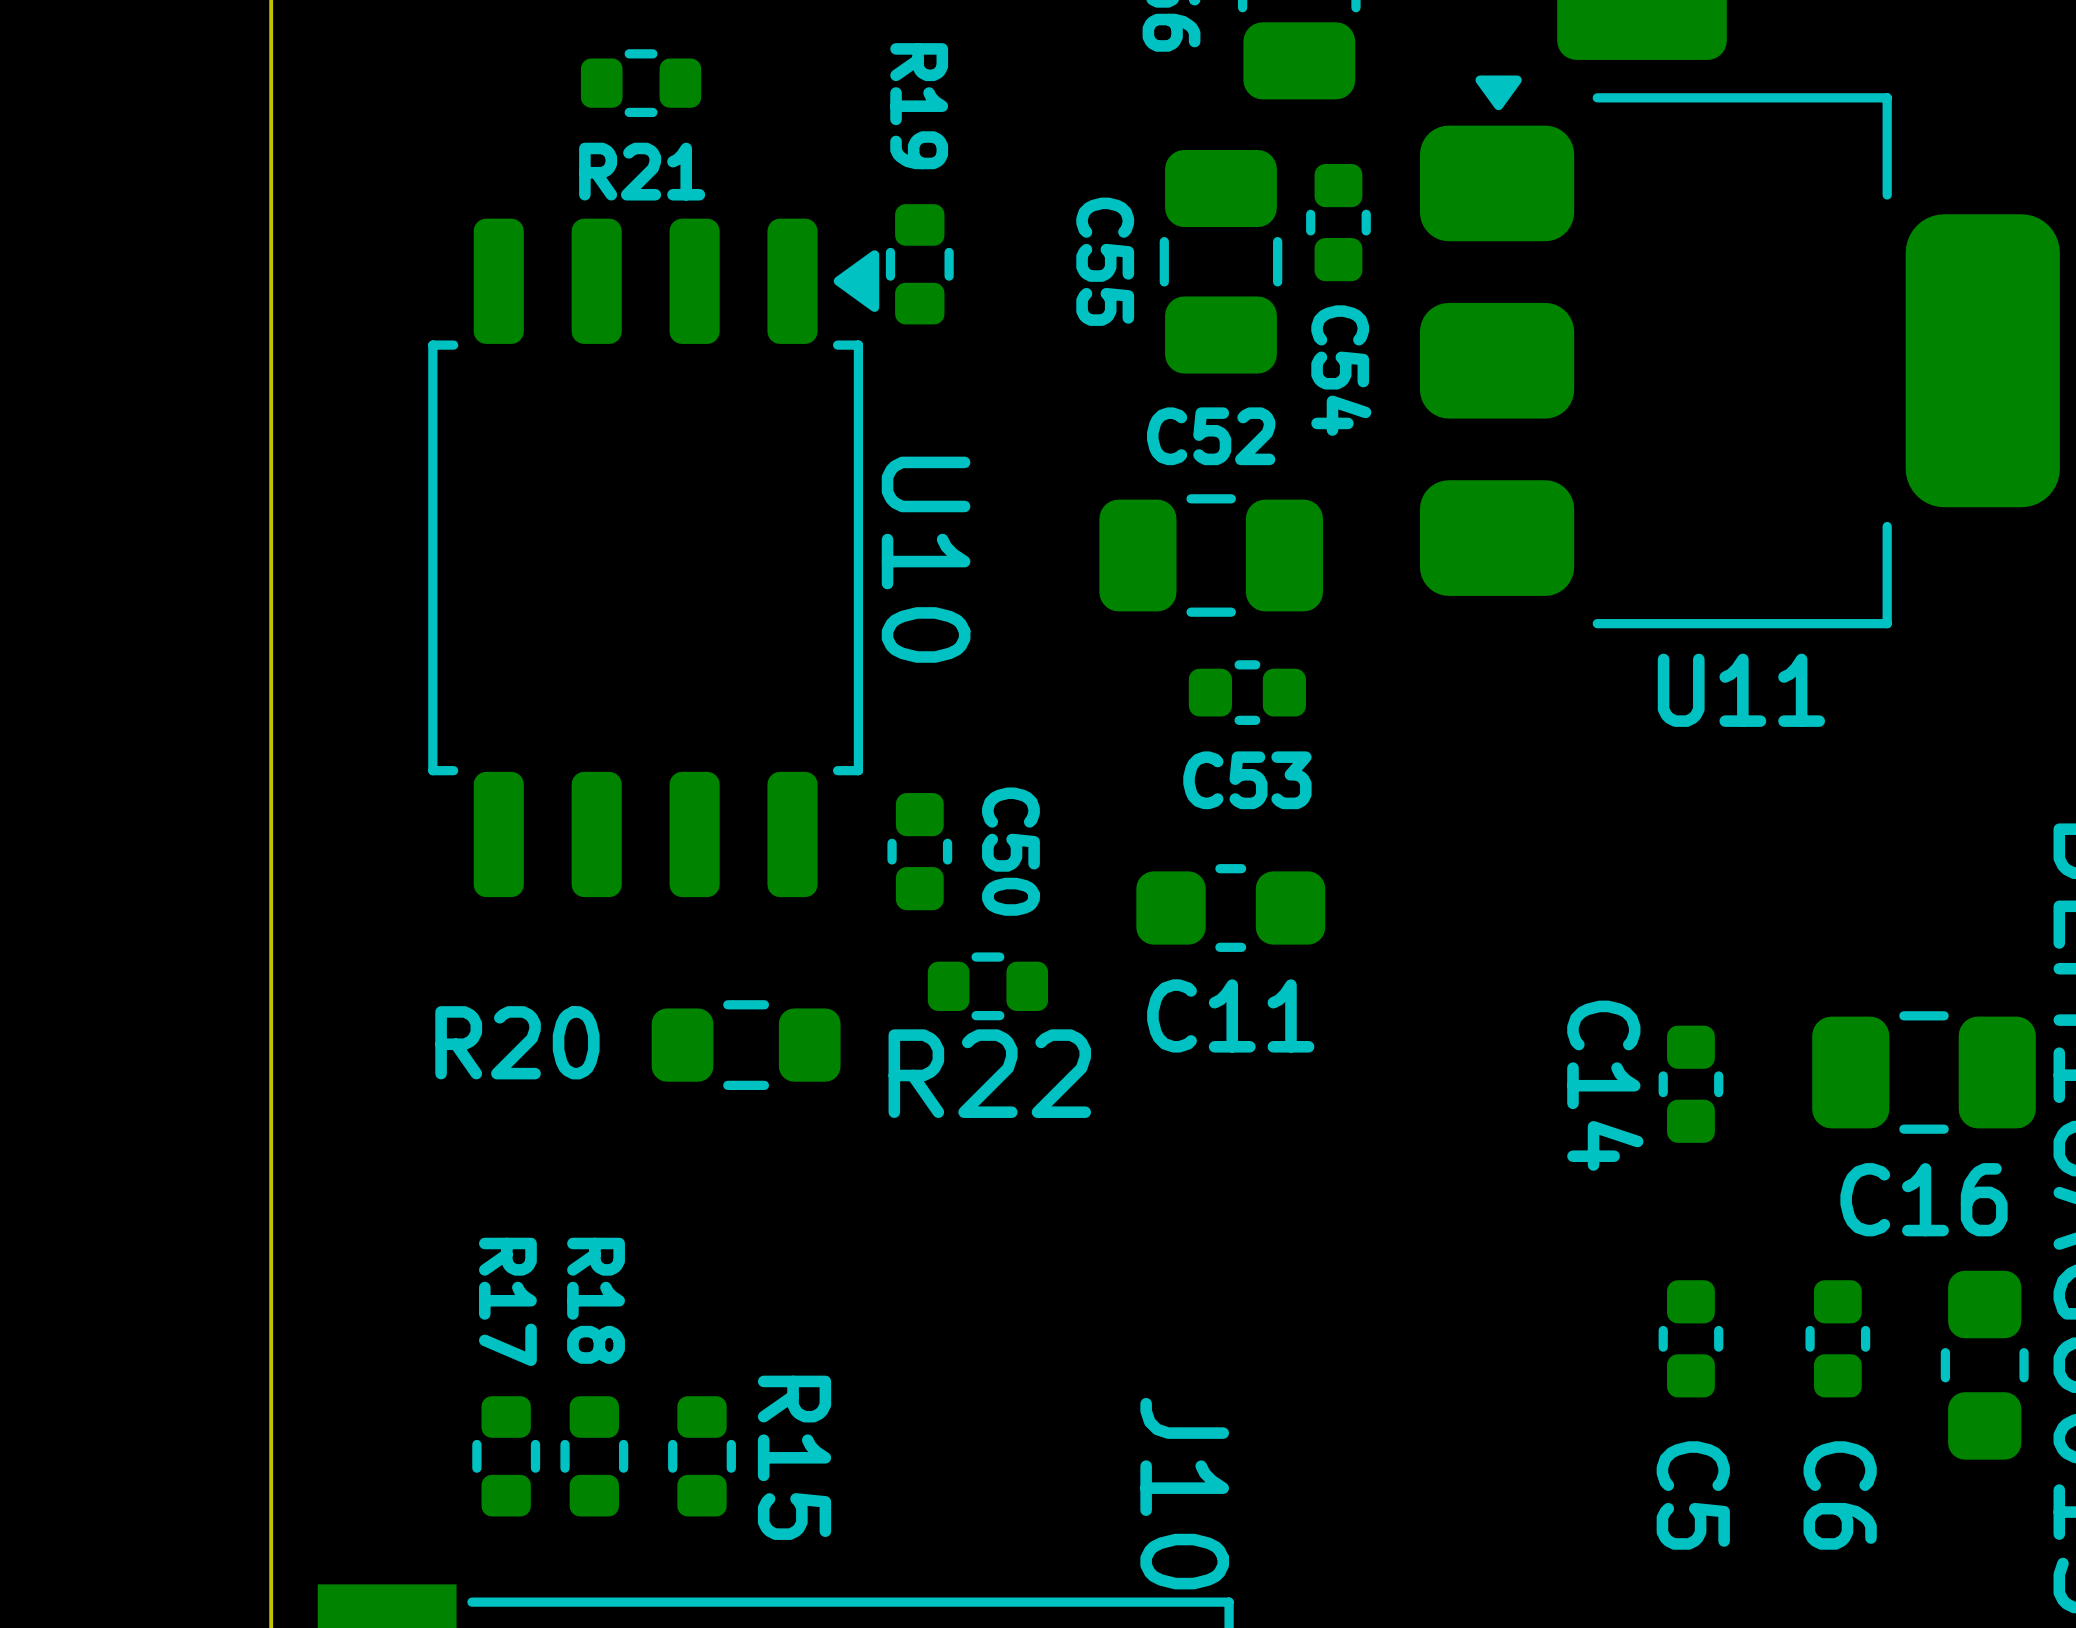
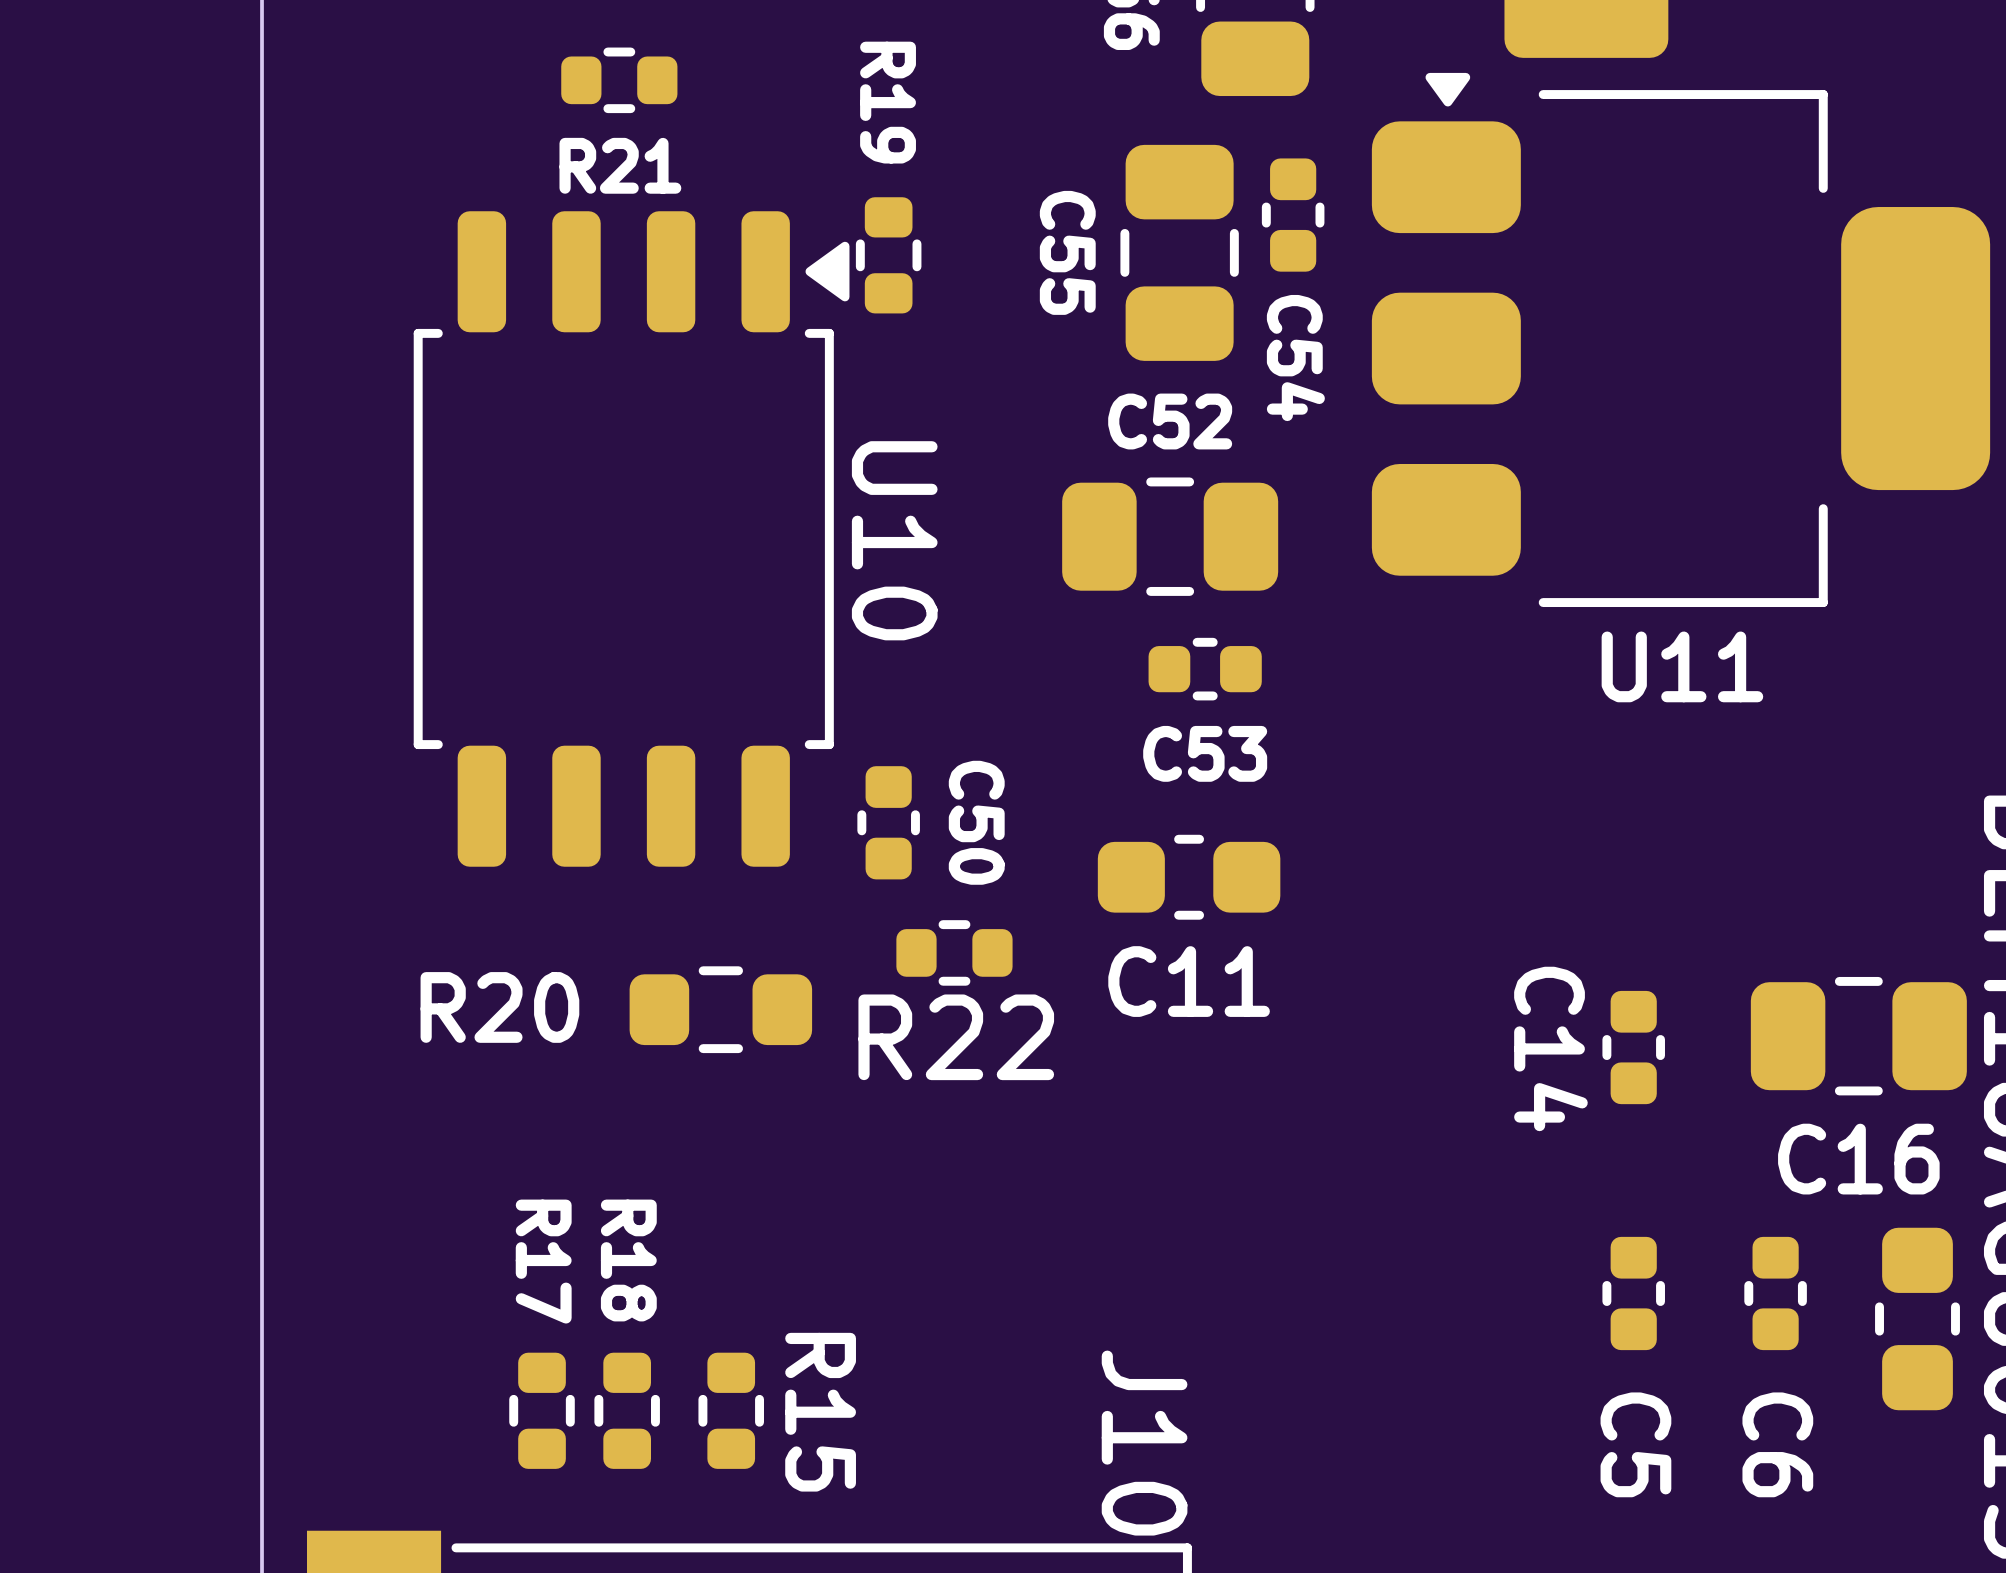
R17 position: (506, 1456) -> (542, 1410)
R18 position: (594, 1456) -> (627, 1410)
R15 position: (702, 1456) -> (731, 1410)

